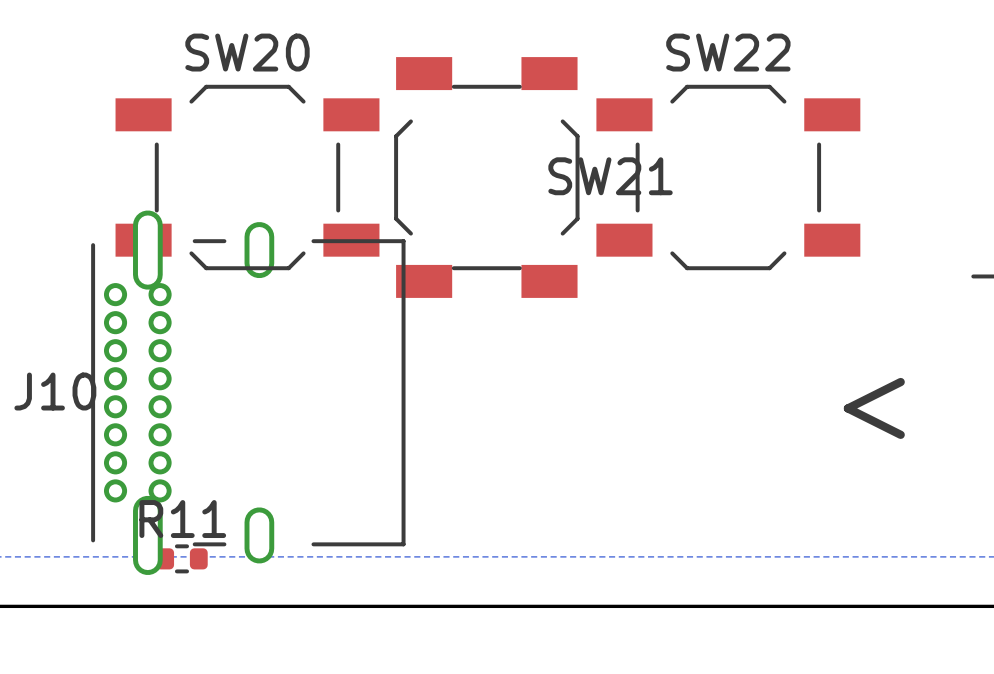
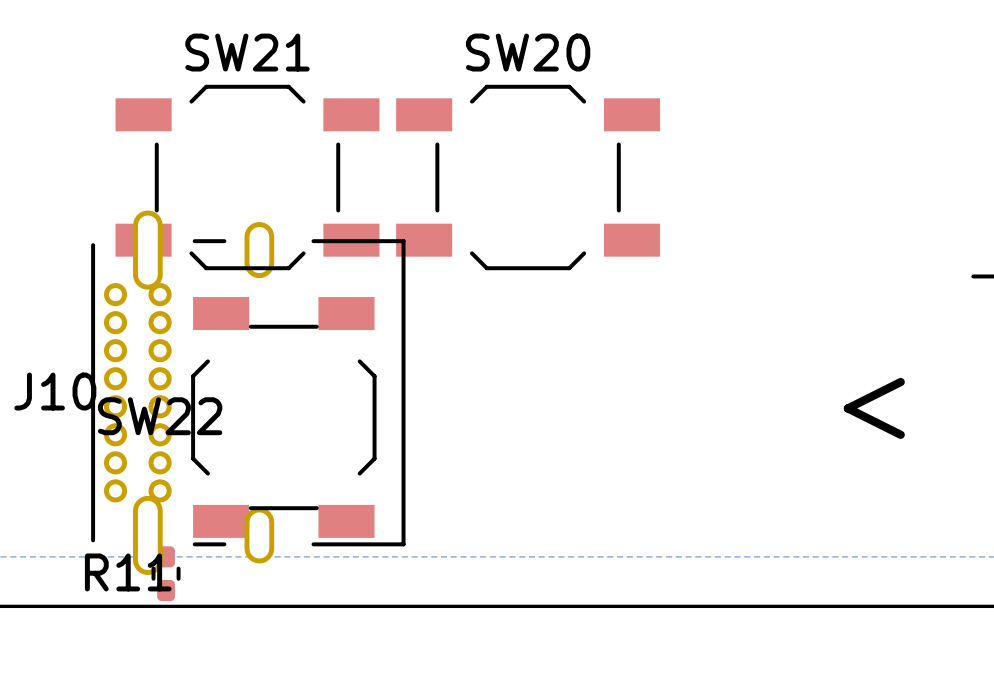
SW20 name: SW20 (247, 52) -> SW21 (247, 52)
SW22 name position: SW22 (728, 52) -> SW22 (160, 416)
SW22 footprint: [596, 84, 861, 271] -> [191, 297, 377, 538]
SW21: (486, 177) -> none
SW20: none -> (528, 177)
R11 name position: R11 (182, 519) -> R11 (128, 572)
R11 footprint: [156, 544, 208, 574] -> [151, 546, 181, 602]

